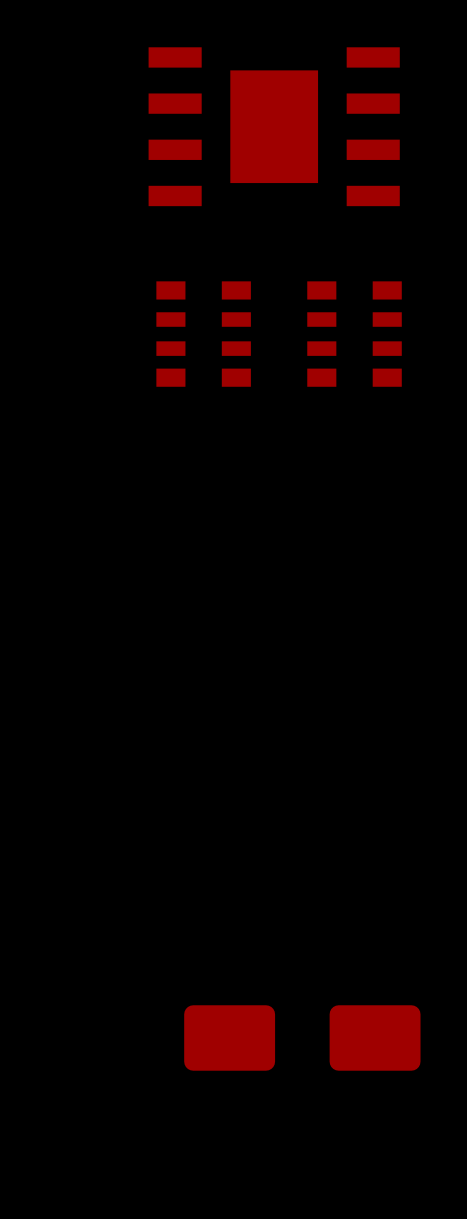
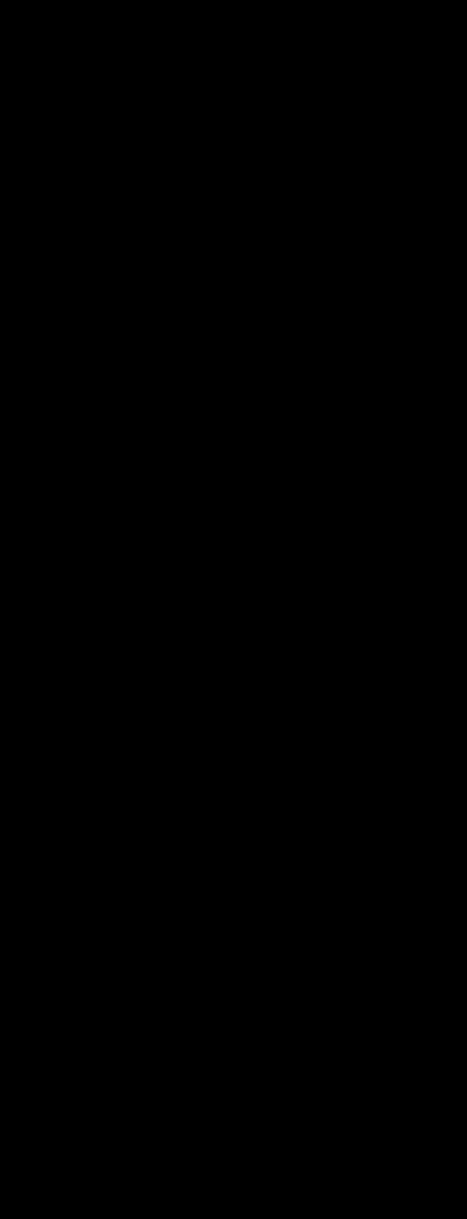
part: (274, 126) -> none
part: (203, 334) -> none
part: (354, 334) -> none
part: (302, 1037) -> none

